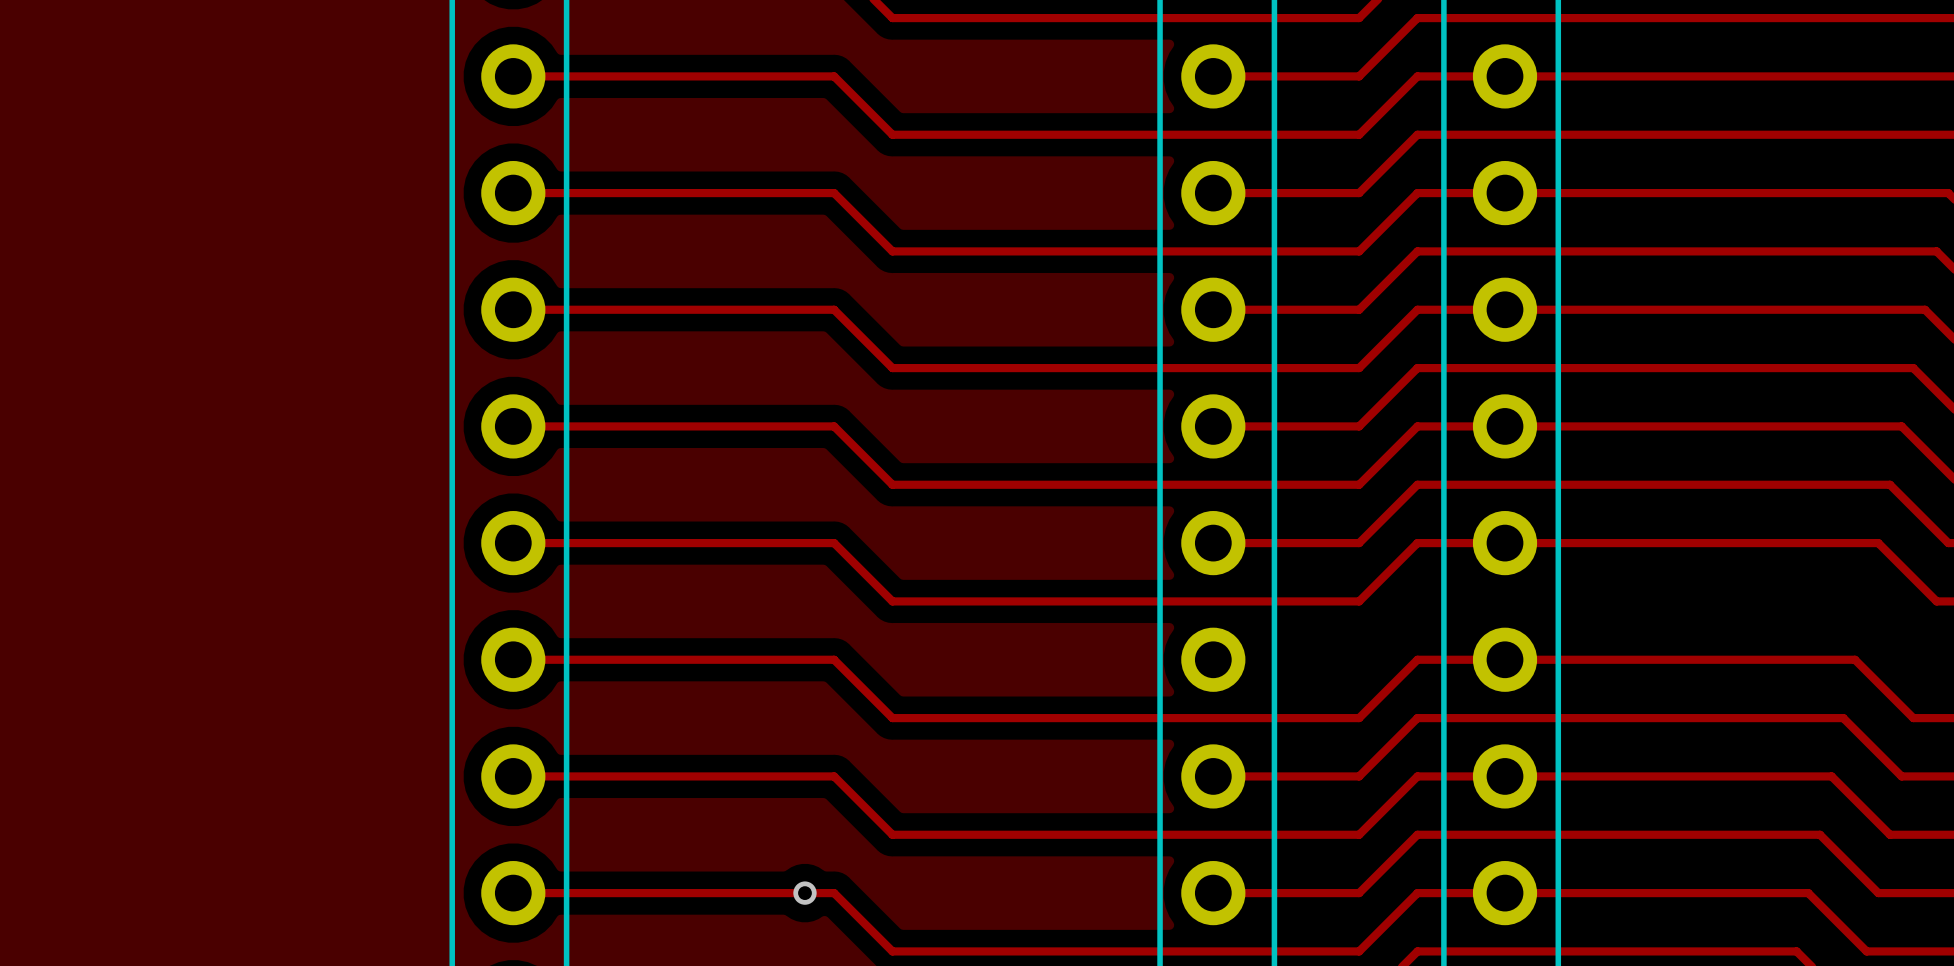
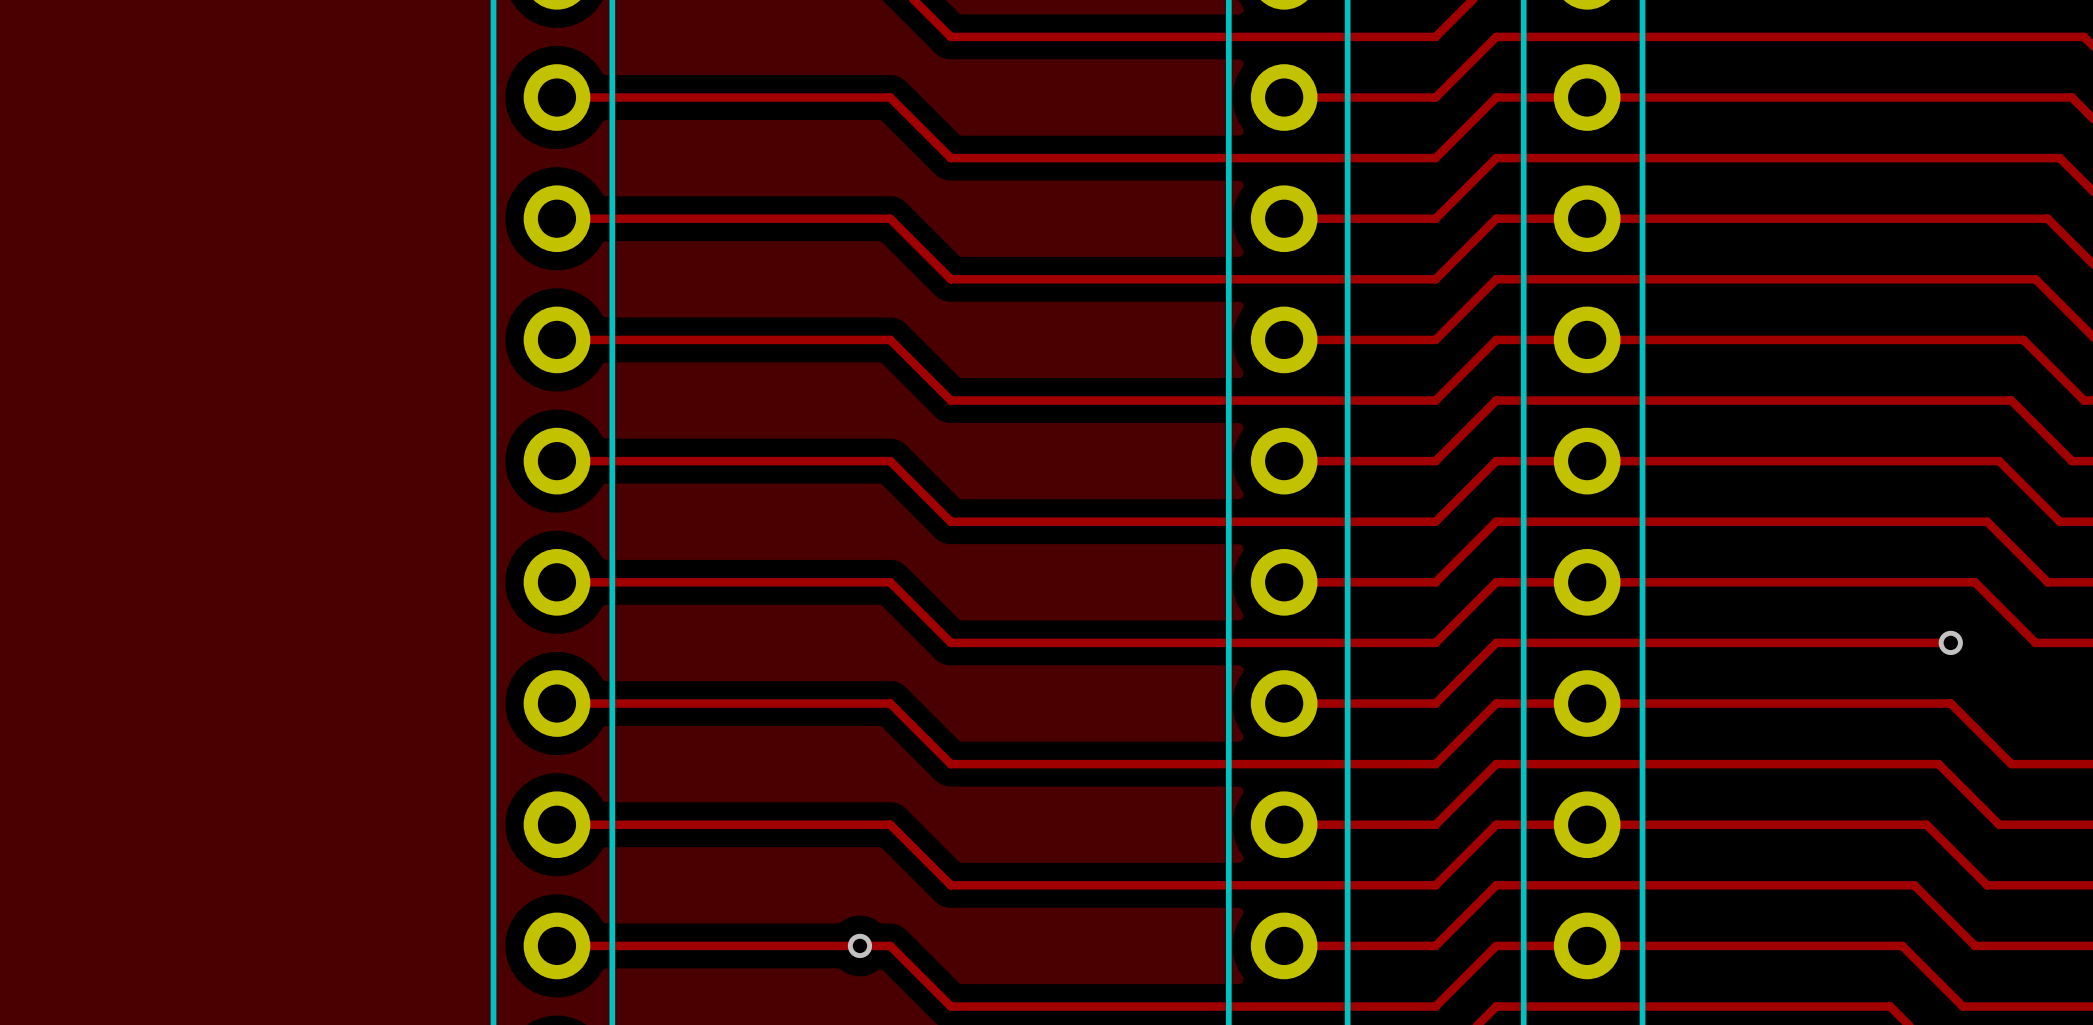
track: none -> (1950, 642) (1496, 642) (1435, 703) (1284, 703)
via: none -> (1950, 642)

